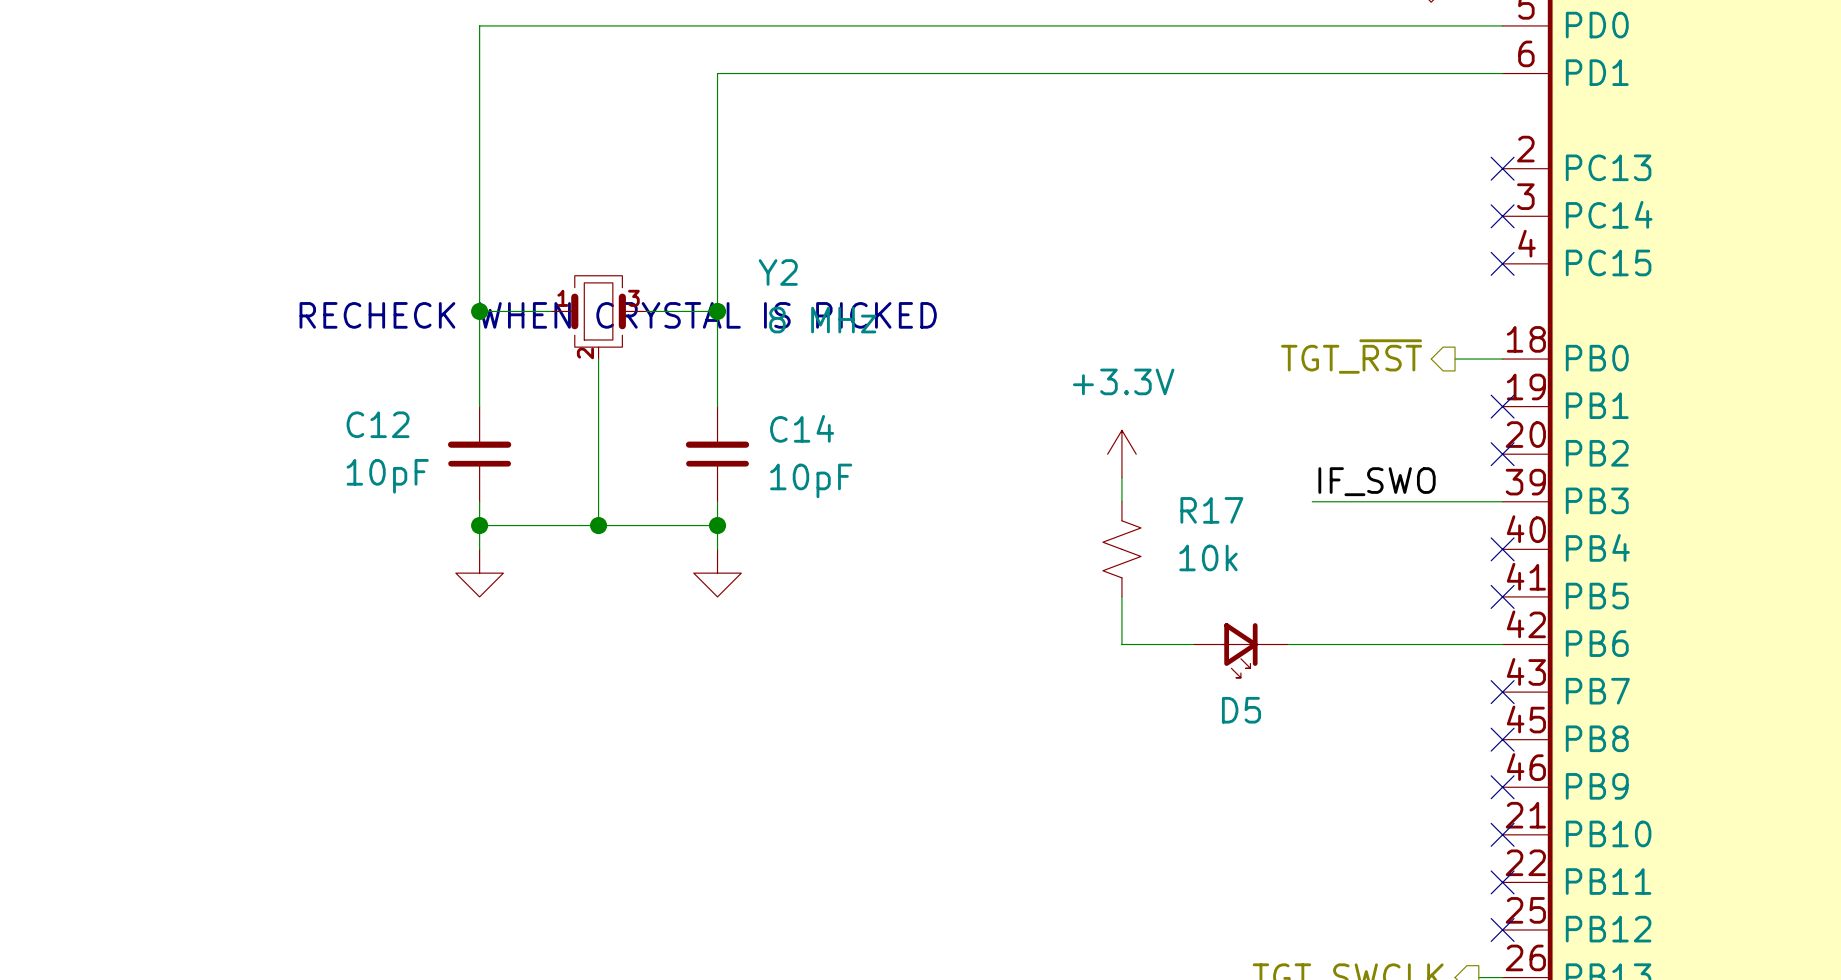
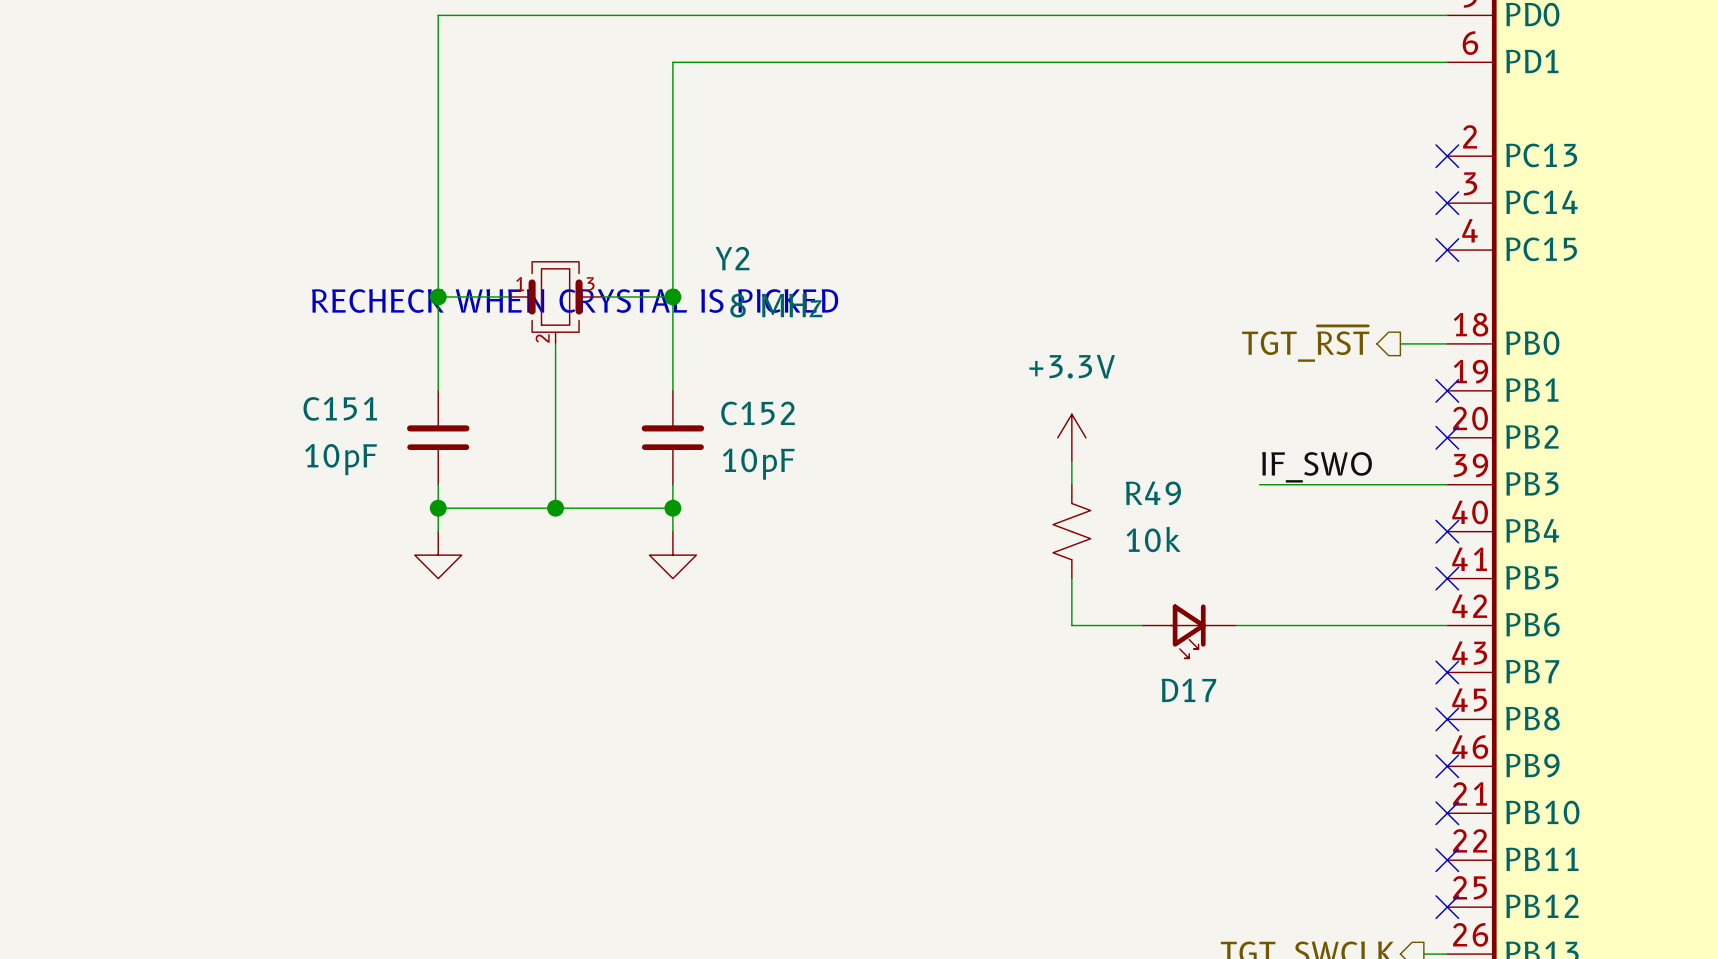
C12 name: C12 (378, 424) -> C151 (340, 408)
C14 name: C14 (802, 428) -> C152 (758, 413)
R17 name: R17 (1211, 510) -> R49 (1153, 493)
D5 name: D5 (1241, 710) -> D17 (1188, 690)

